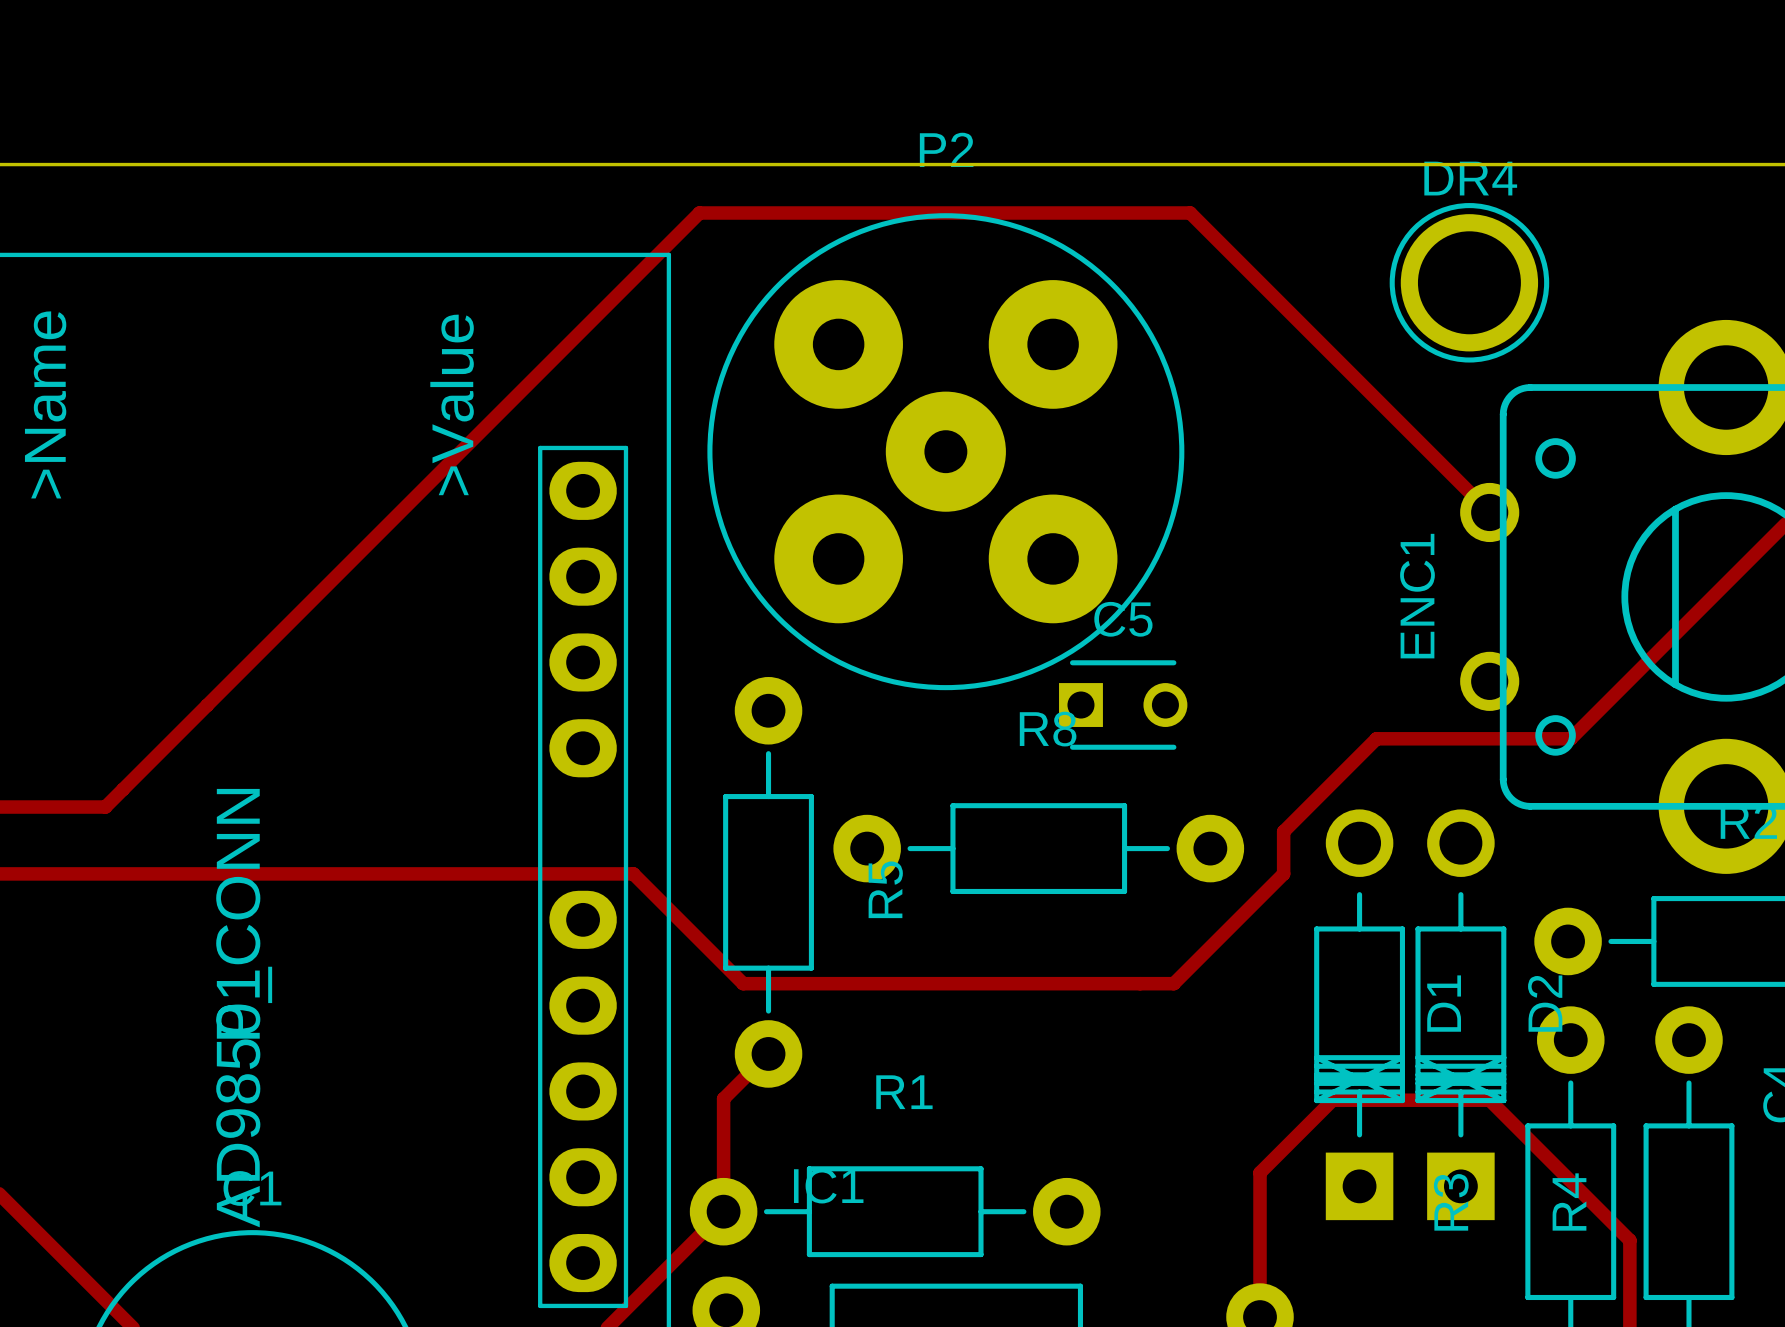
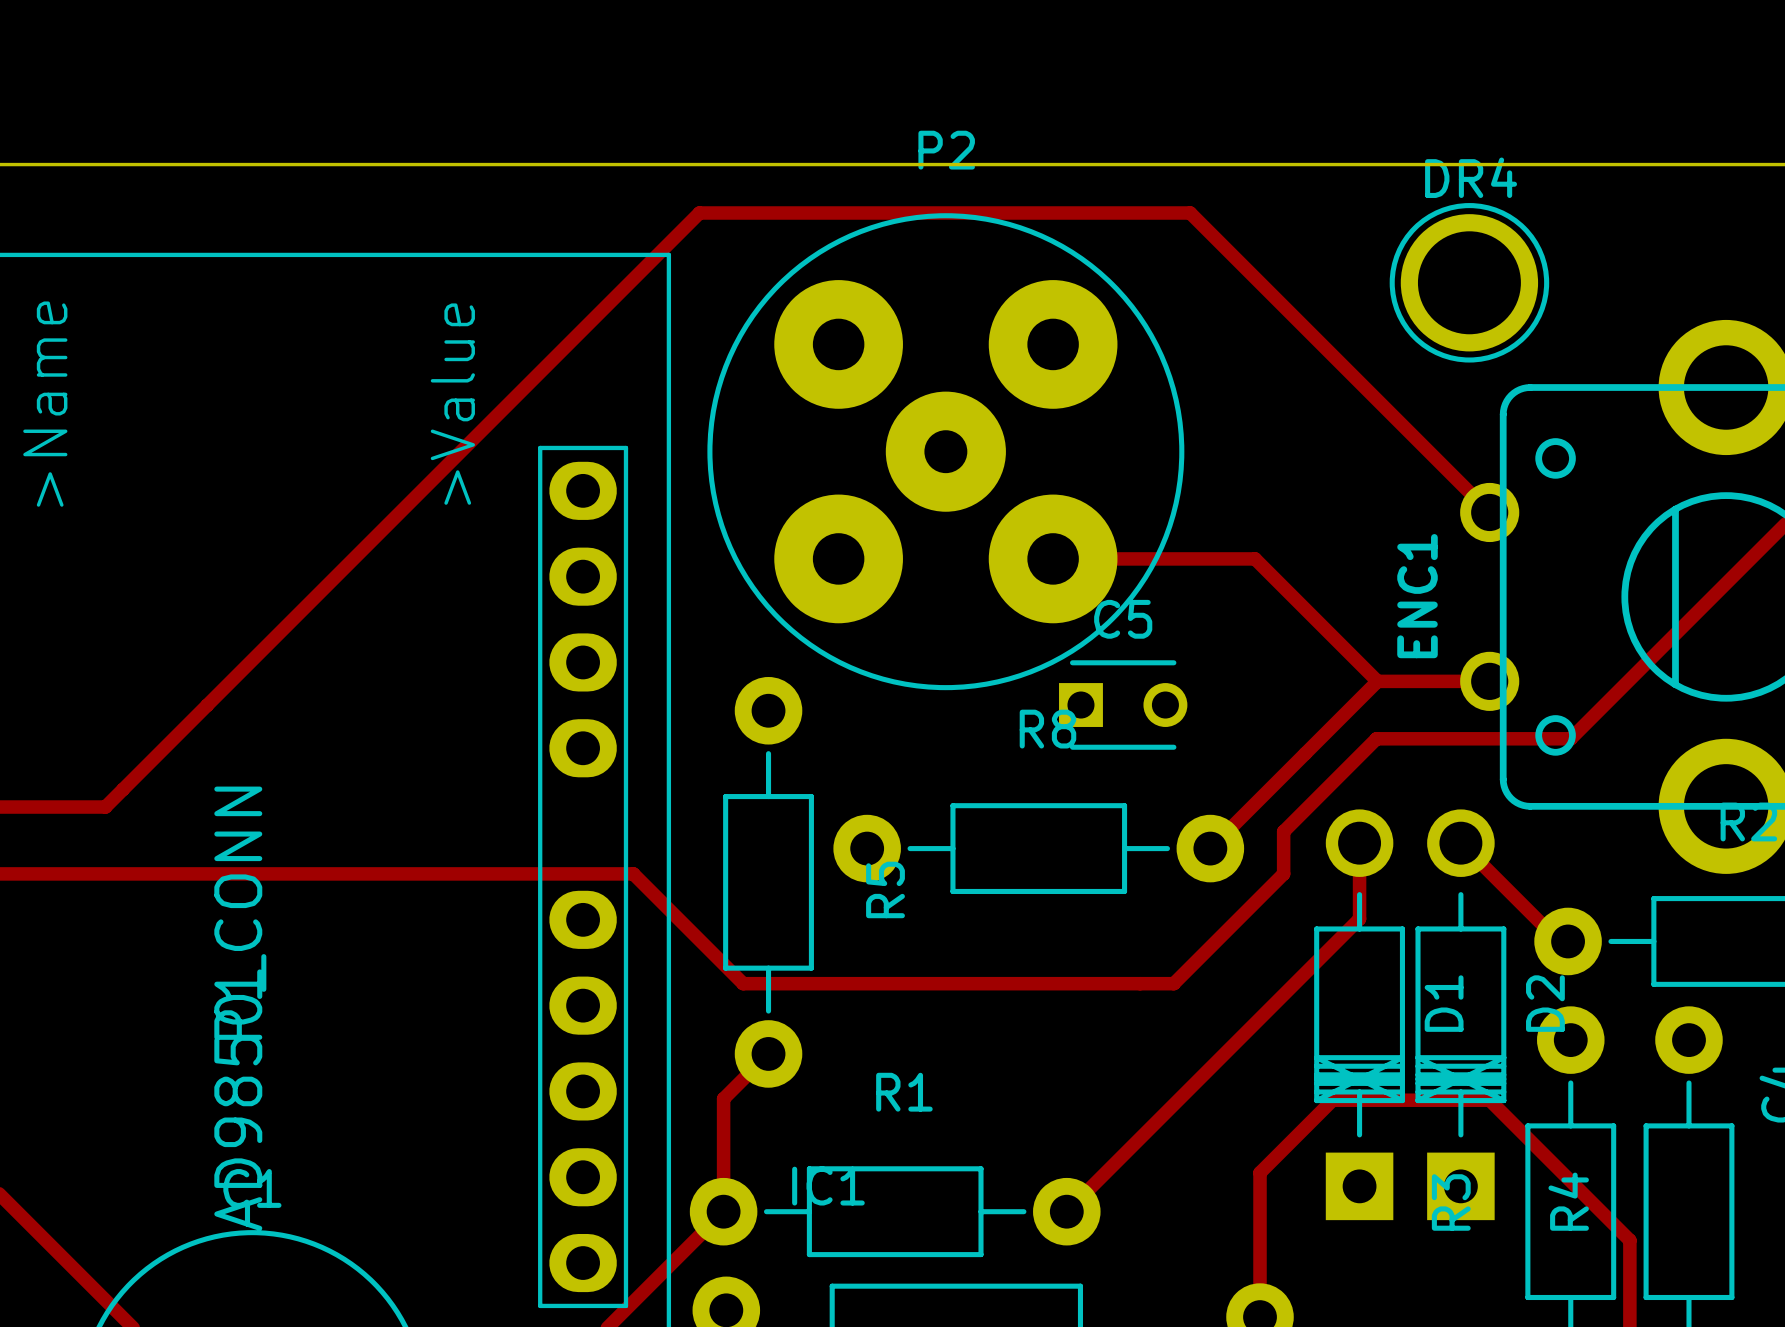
track: none -> (1053, 558) (1255, 558) (1377, 681)
track: none -> (1377, 681) (1489, 681)
track: none -> (1377, 681) (1210, 848)
track: none -> (1359, 843) (1359, 918) (1066, 1211)
track: none -> (1460, 843) (1559, 941) (1568, 941)

